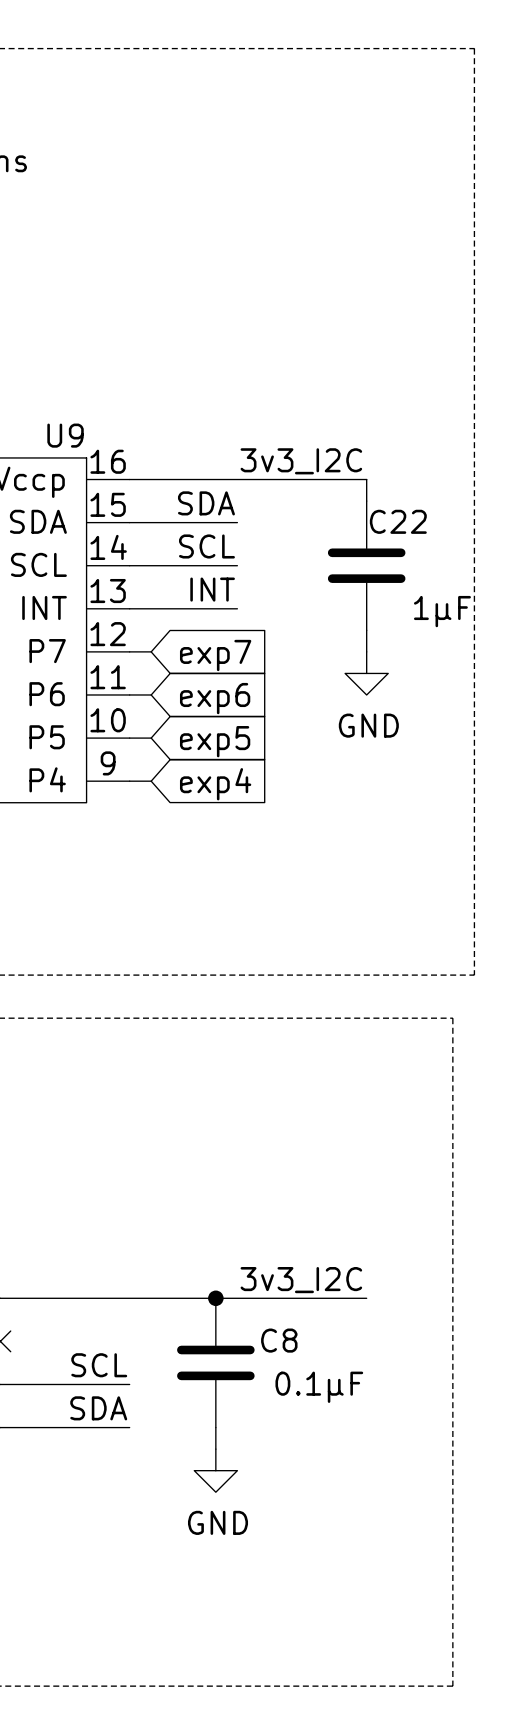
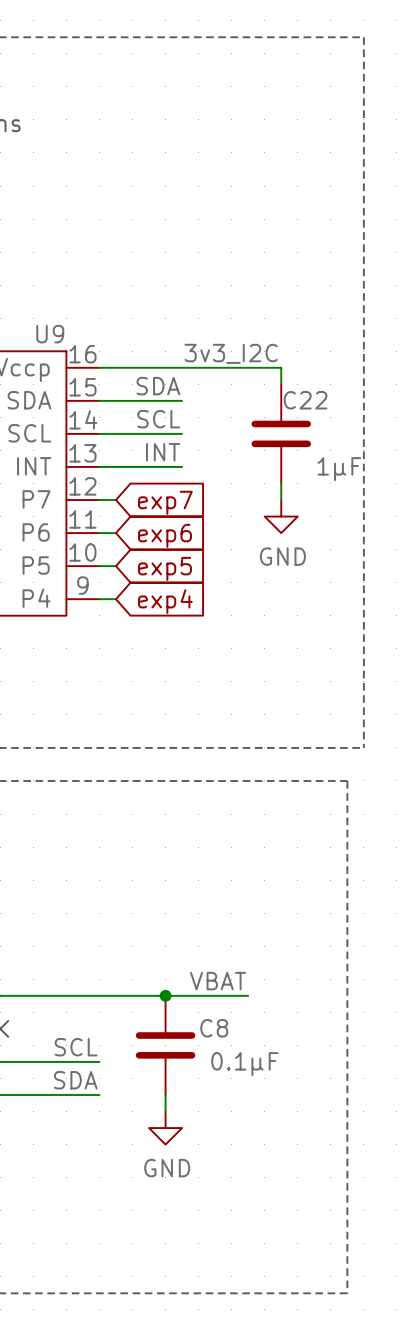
label: none -> VBAT (218, 981)
label: 3v3_I2C (301, 1280) -> none
wire: (323, 1298) (366, 1298) -> none

